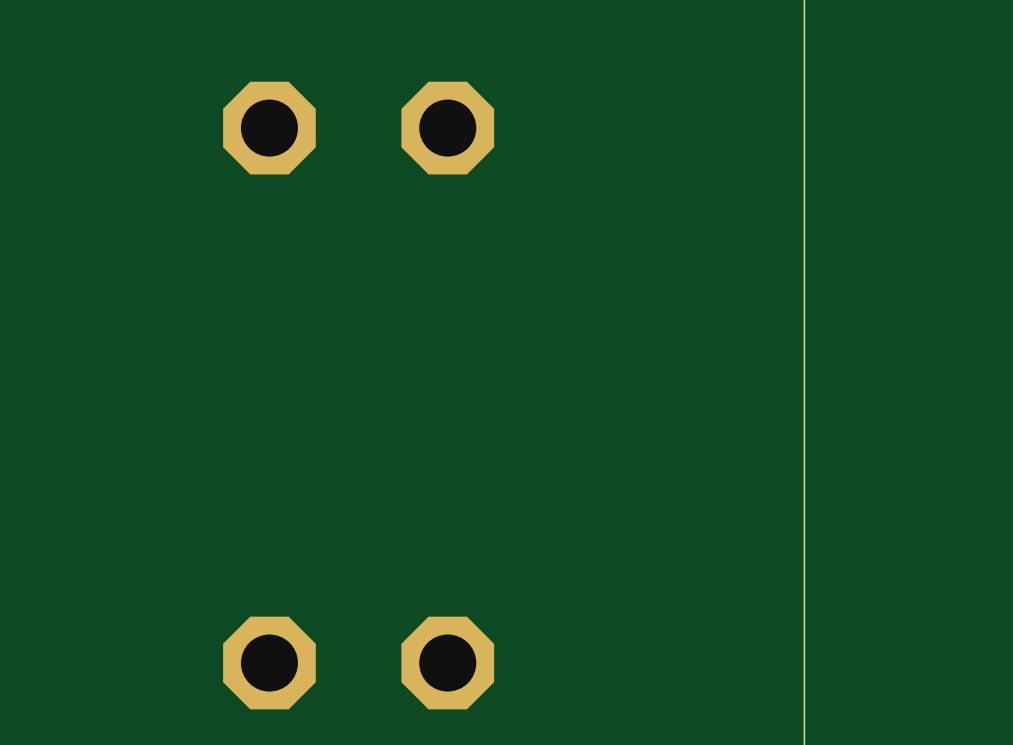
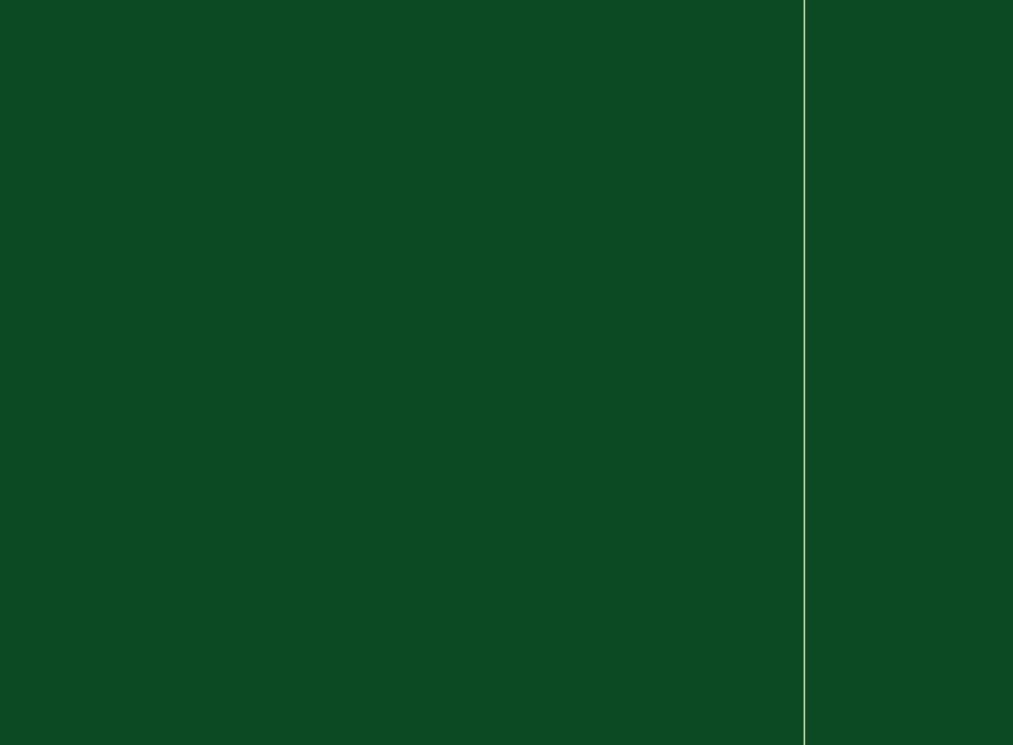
part: (358, 128) -> none
part: (358, 663) -> none

